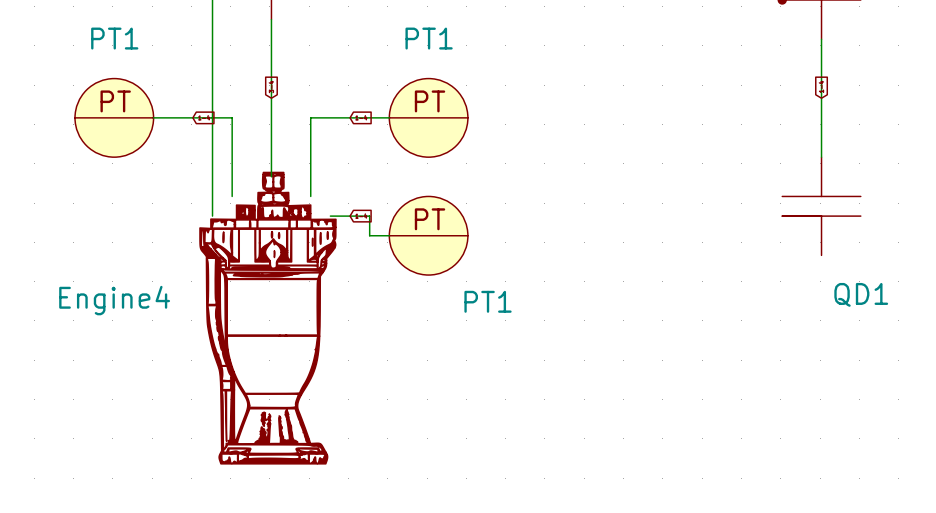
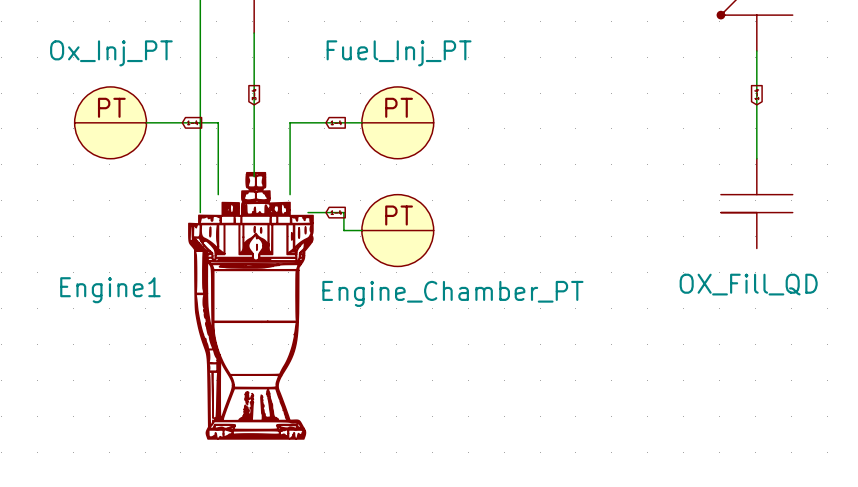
PT1 name: PT1 (114, 38) -> Ox_Inj_PT (111, 53)
PT1 name: PT1 (429, 38) -> Fuel_Inj_PT (399, 53)
QD1 name: QD1 (861, 294) -> OX_Fill_QD (748, 284)
Engine4 name: Engine4 (114, 300) -> Engine1 (110, 290)
PT1 name: PT1 (488, 301) -> Engine_Chamber_PT (452, 293)

